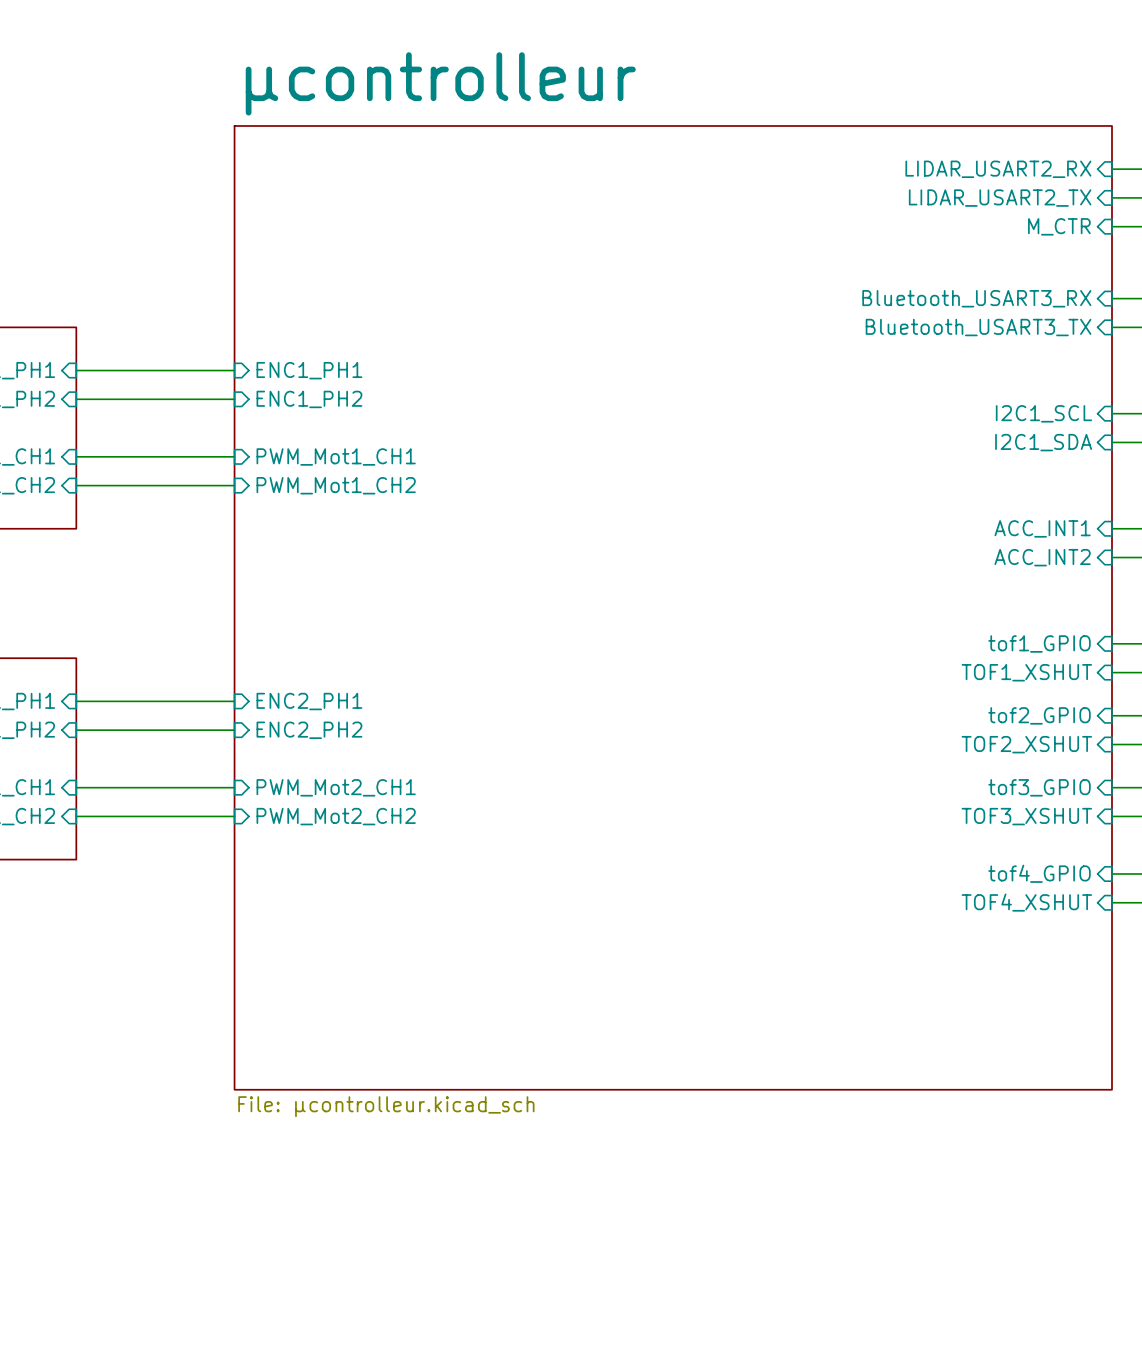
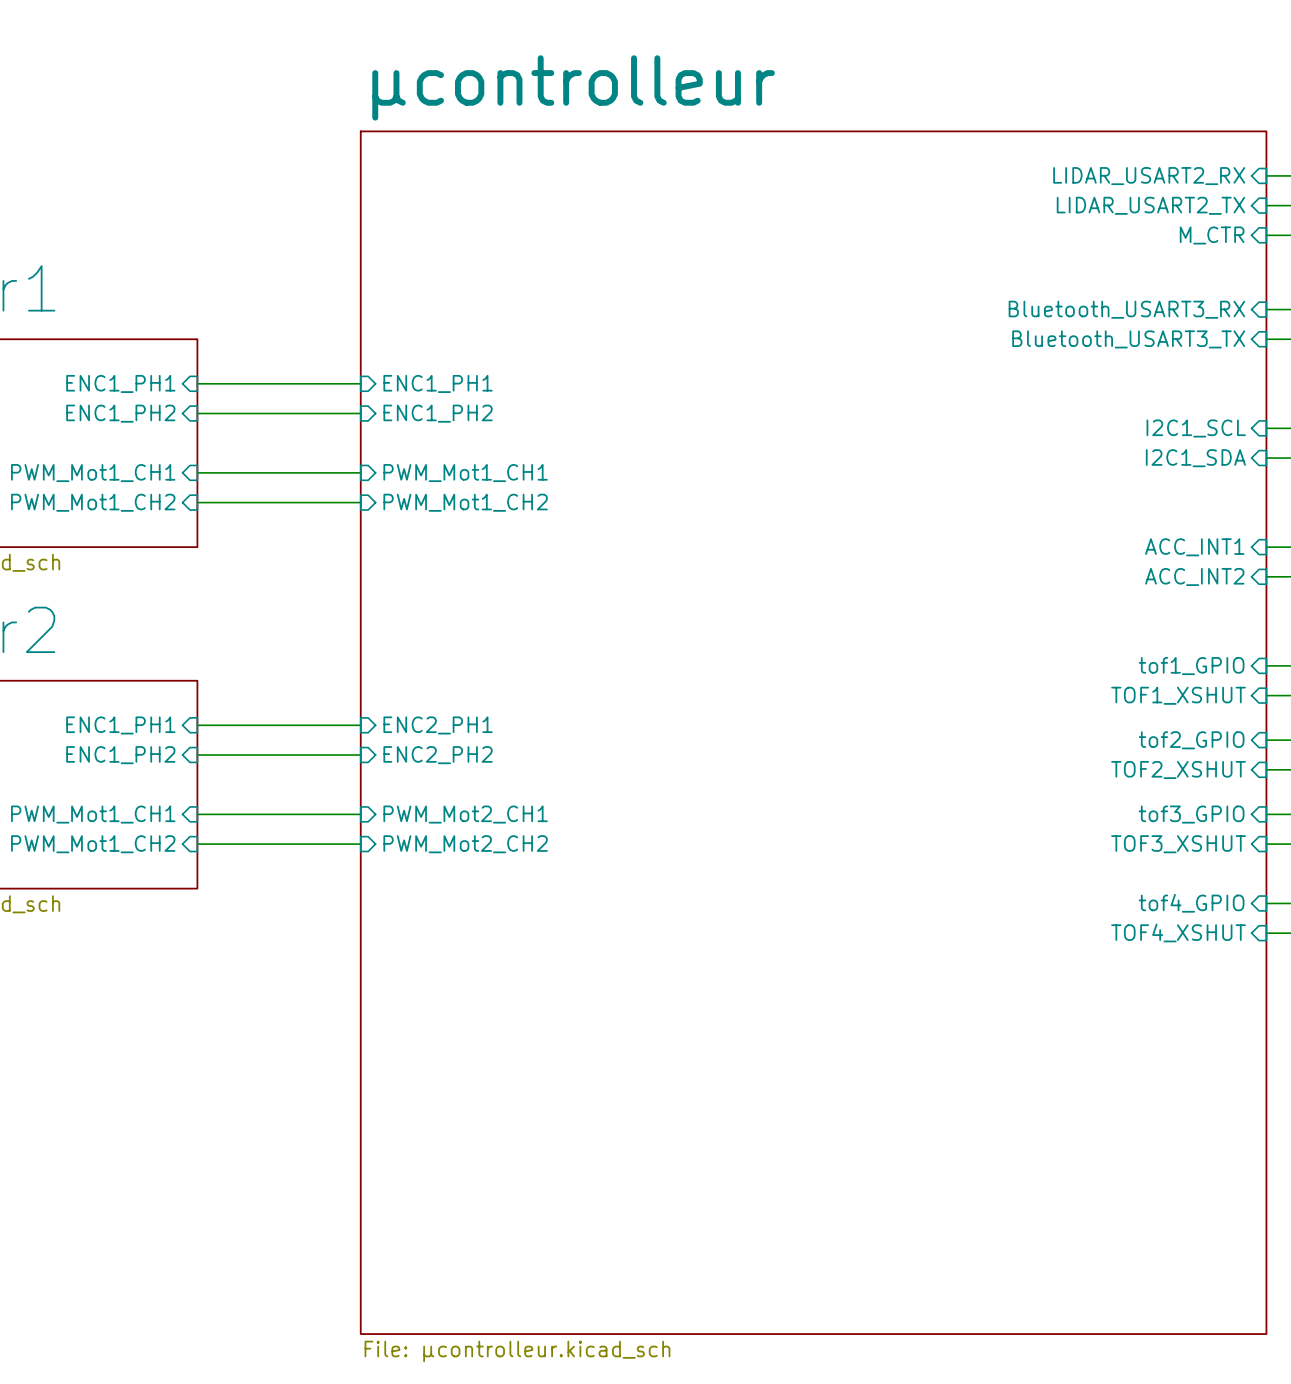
sheet µcontrolleur: File: µcontrolleur.kicad_sch (673, 607) -> none
sheet µcontrolleur: none -> File: µcontrolleur.kicad_sch (813, 732)

